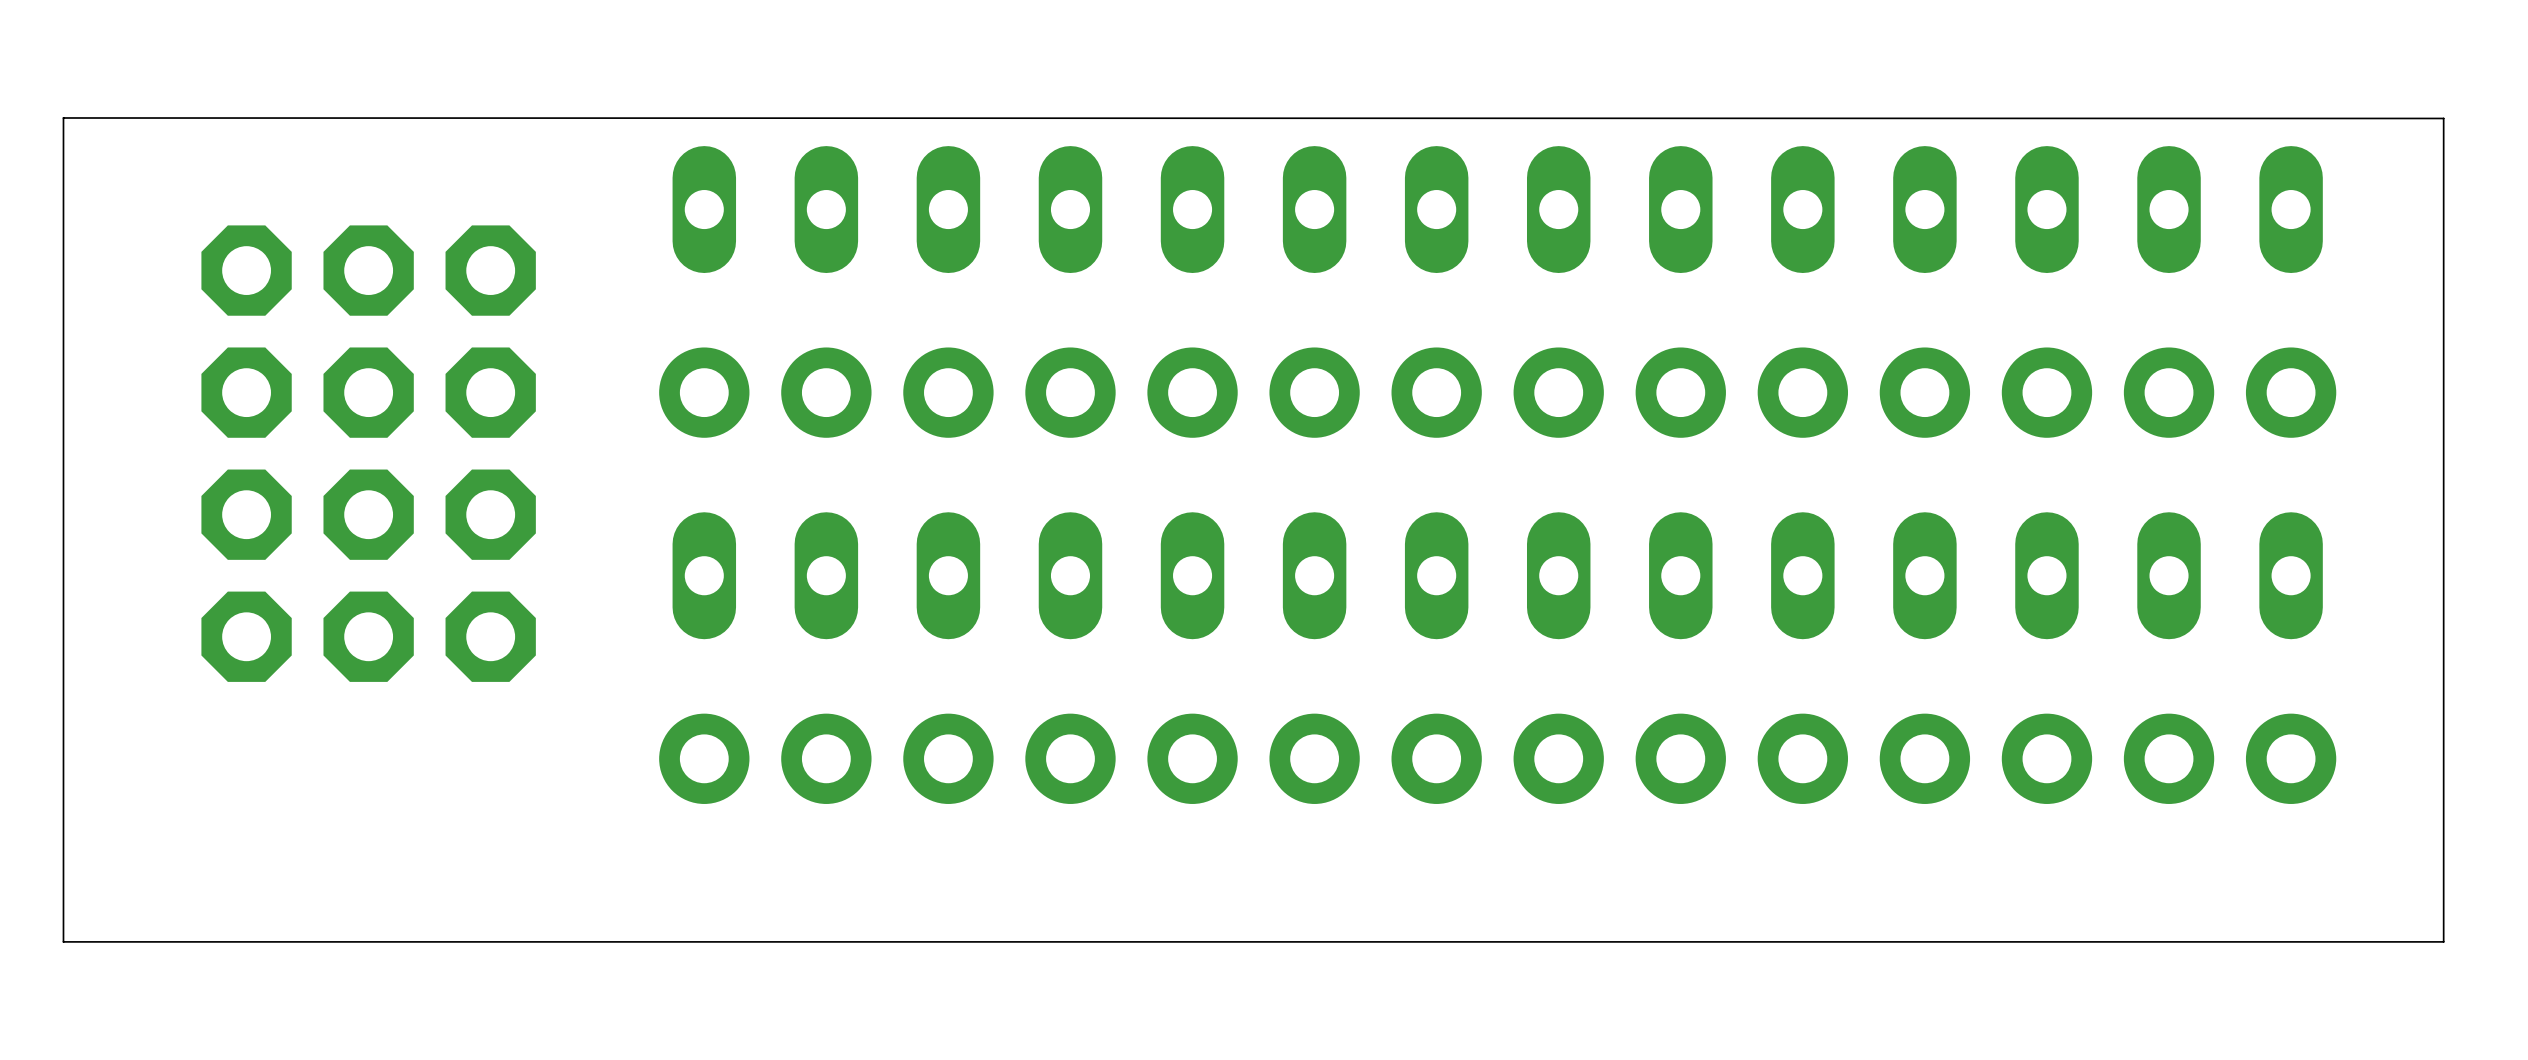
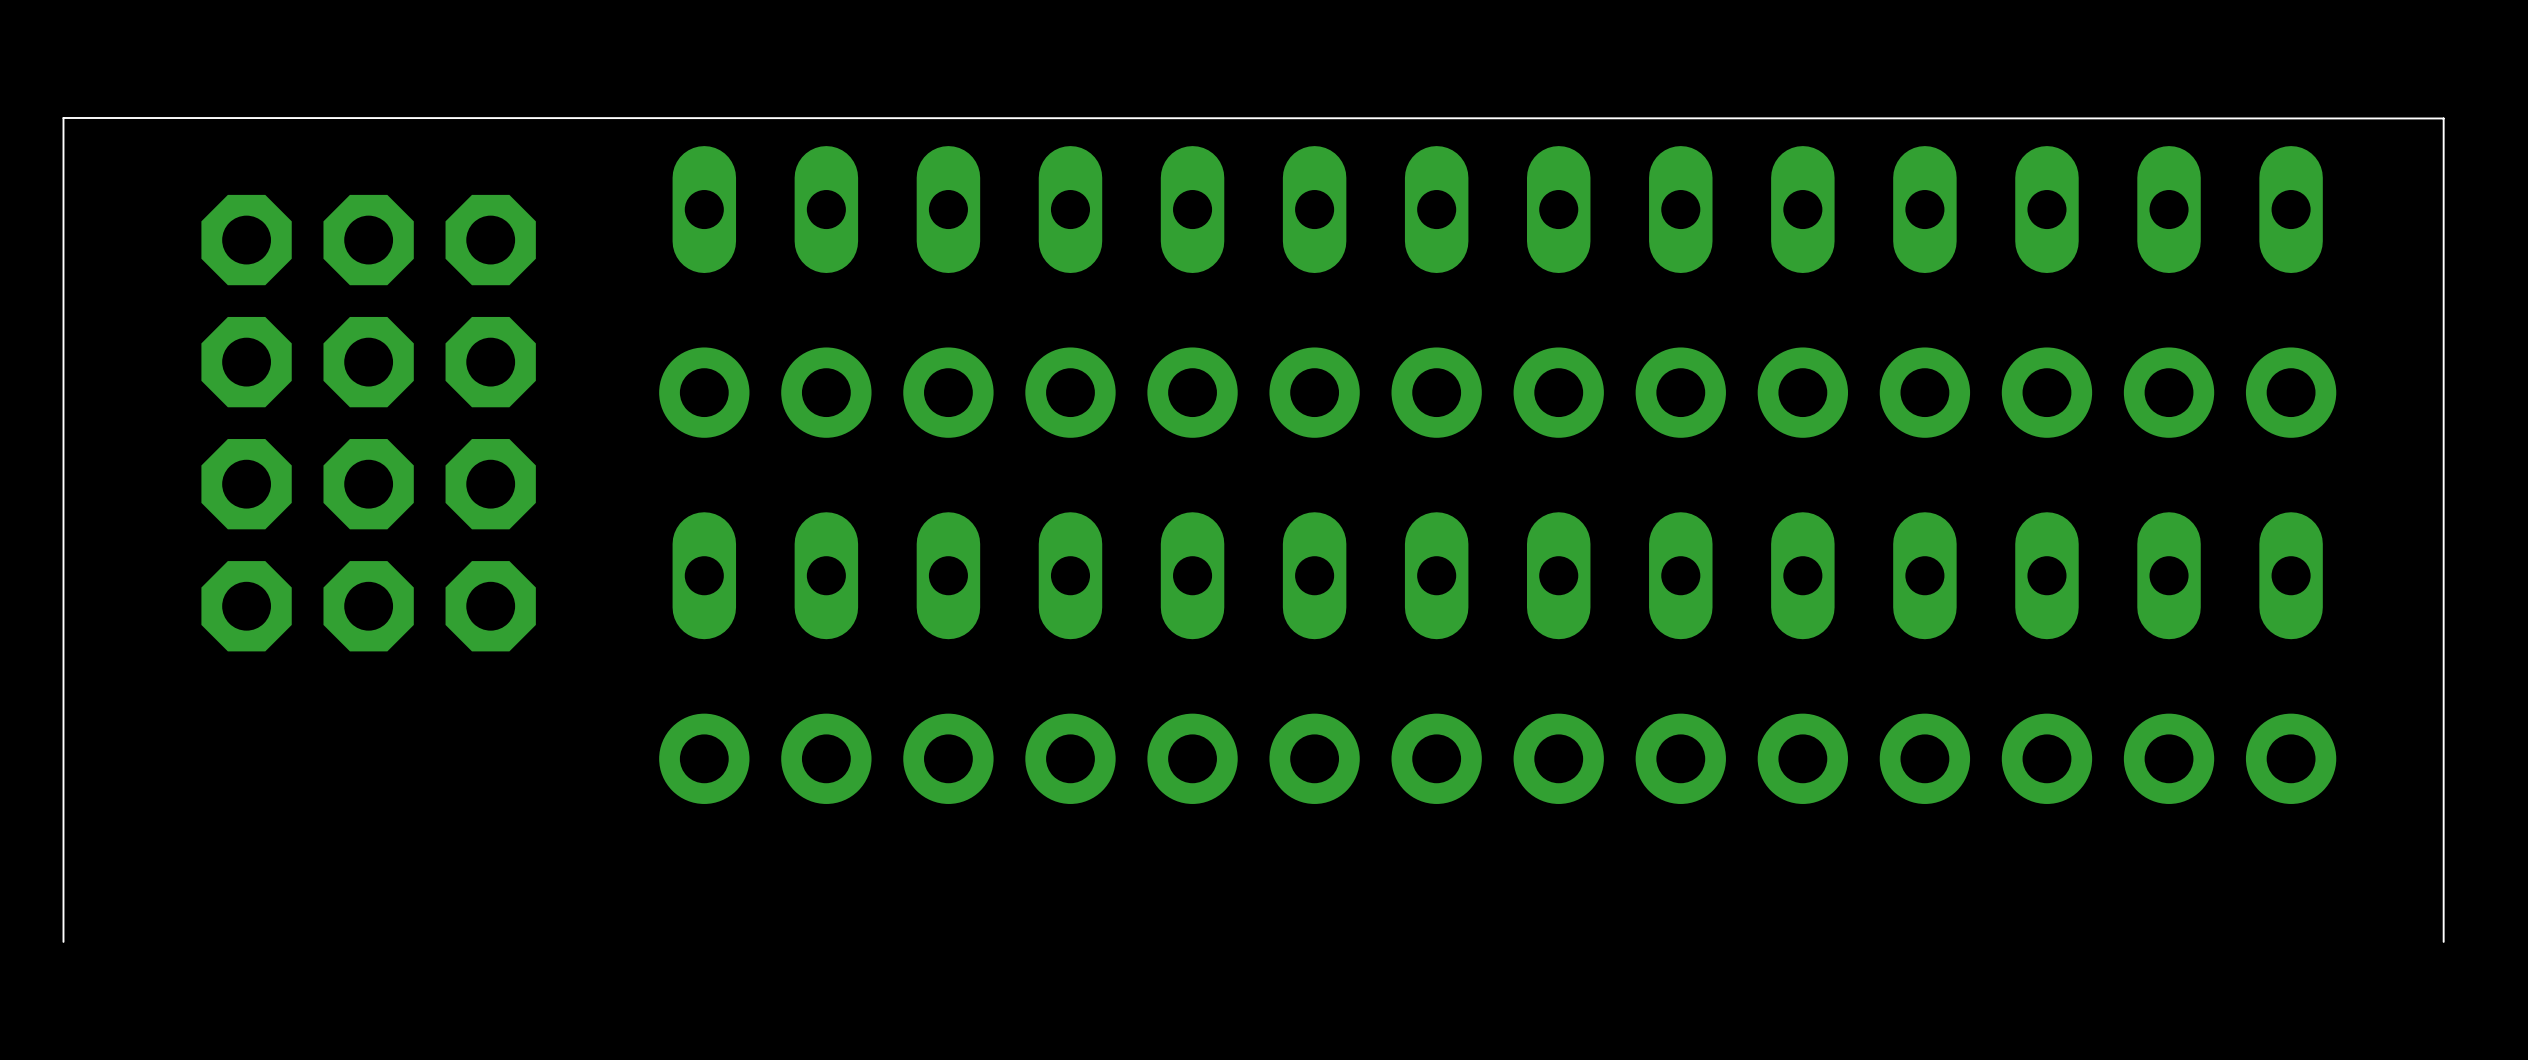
part position: (368, 331) -> (368, 301)
part position: (368, 575) -> (368, 545)
board edge: (2443, 941) (63, 941) -> none

